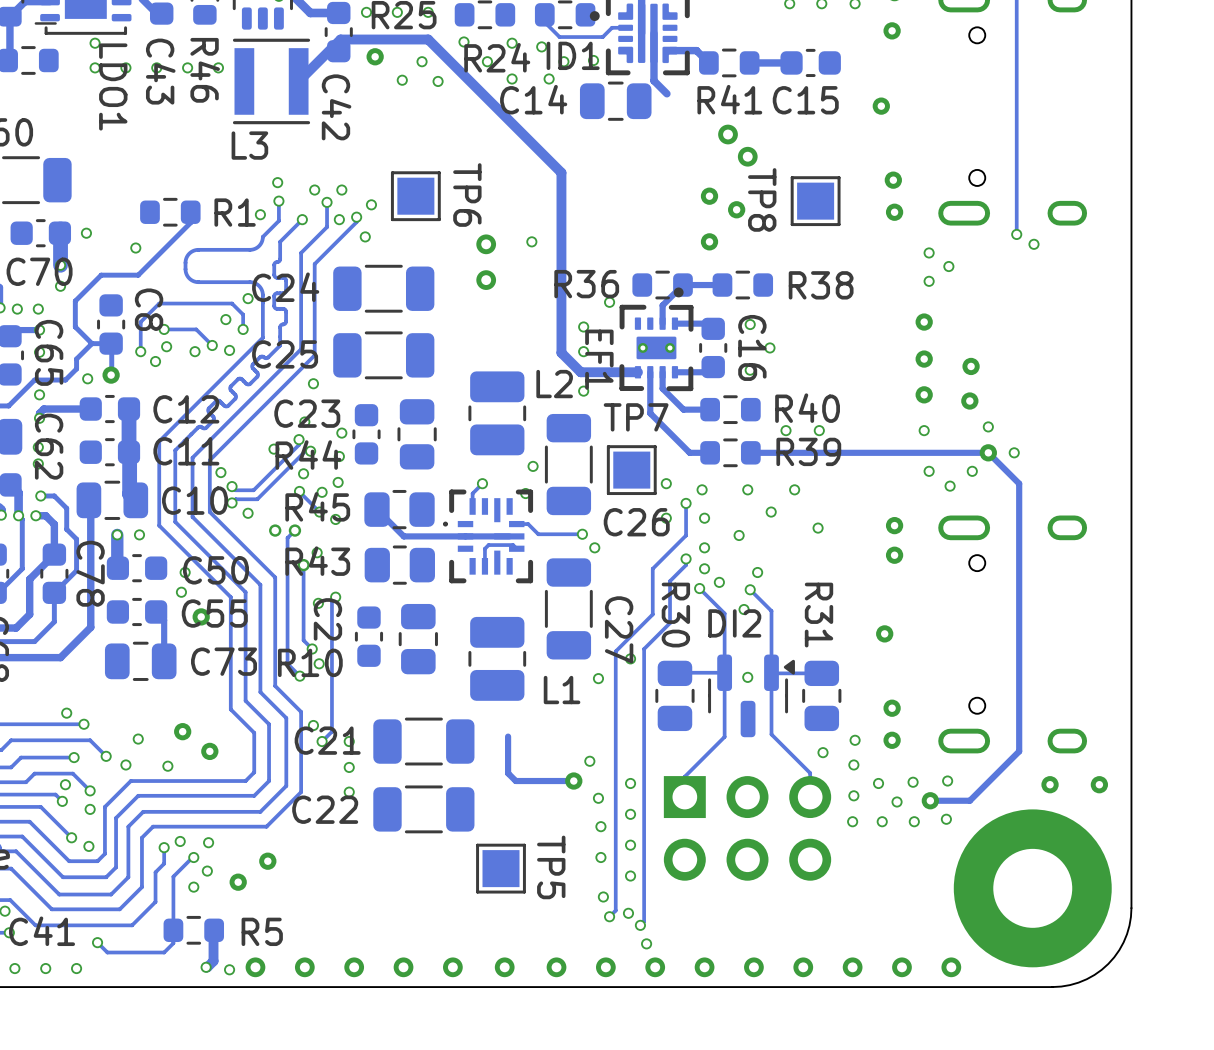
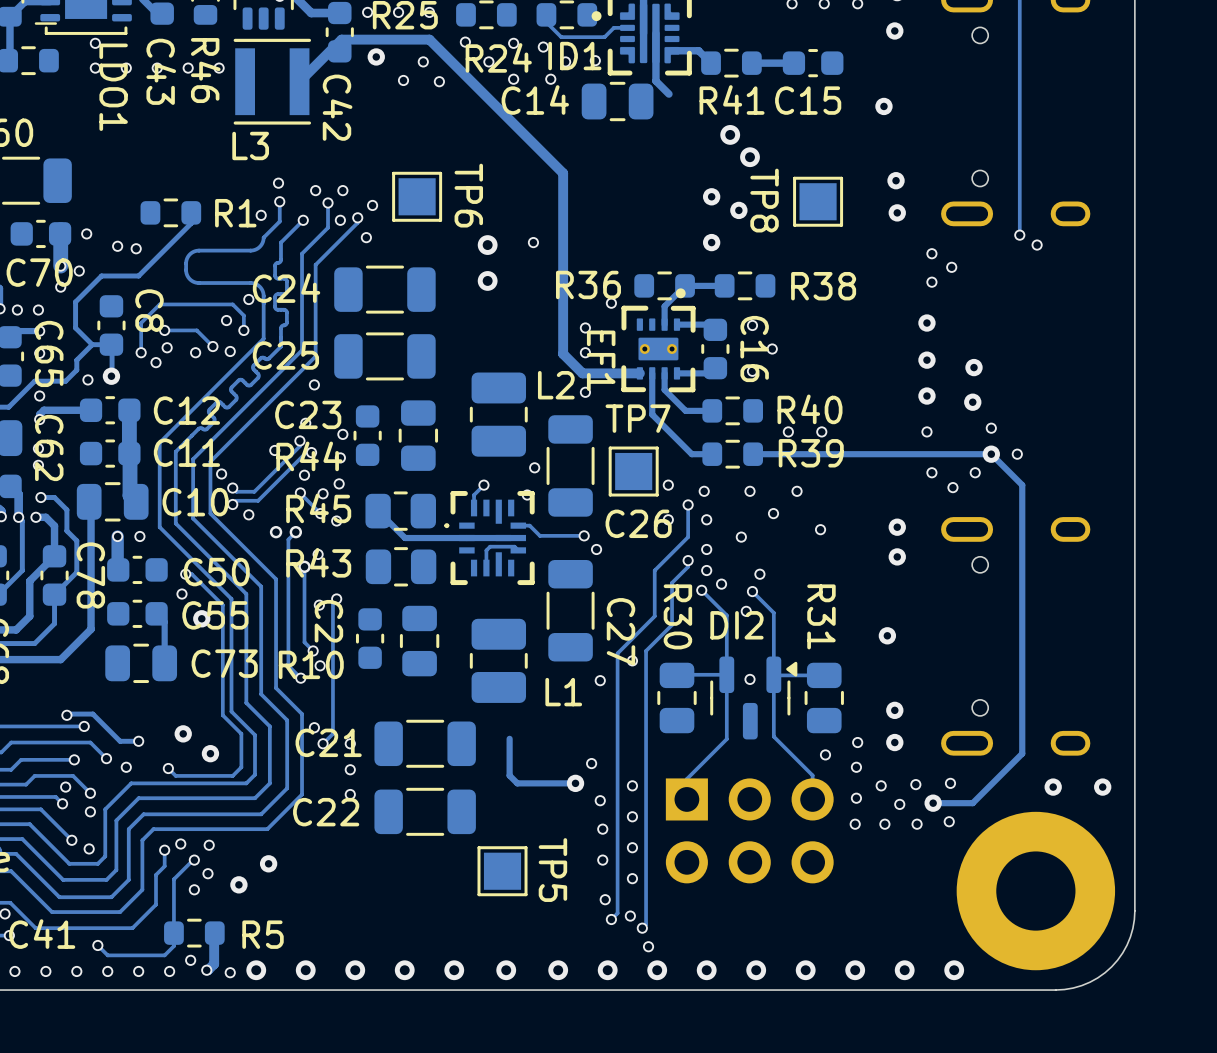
via: none -> (117, 246)
via: none -> (79, 271)
track: none -> (185, 574) (191, 574) (222, 605) (222, 715) (241, 733) (241, 767) (232, 775) (175, 775) (168, 768)
track: none -> (66, 715) (92, 714) (120, 741) (138, 741)
via: none -> (190, 960)
via: none -> (107, 971)
via: none -> (138, 971)
via: none -> (169, 971)

